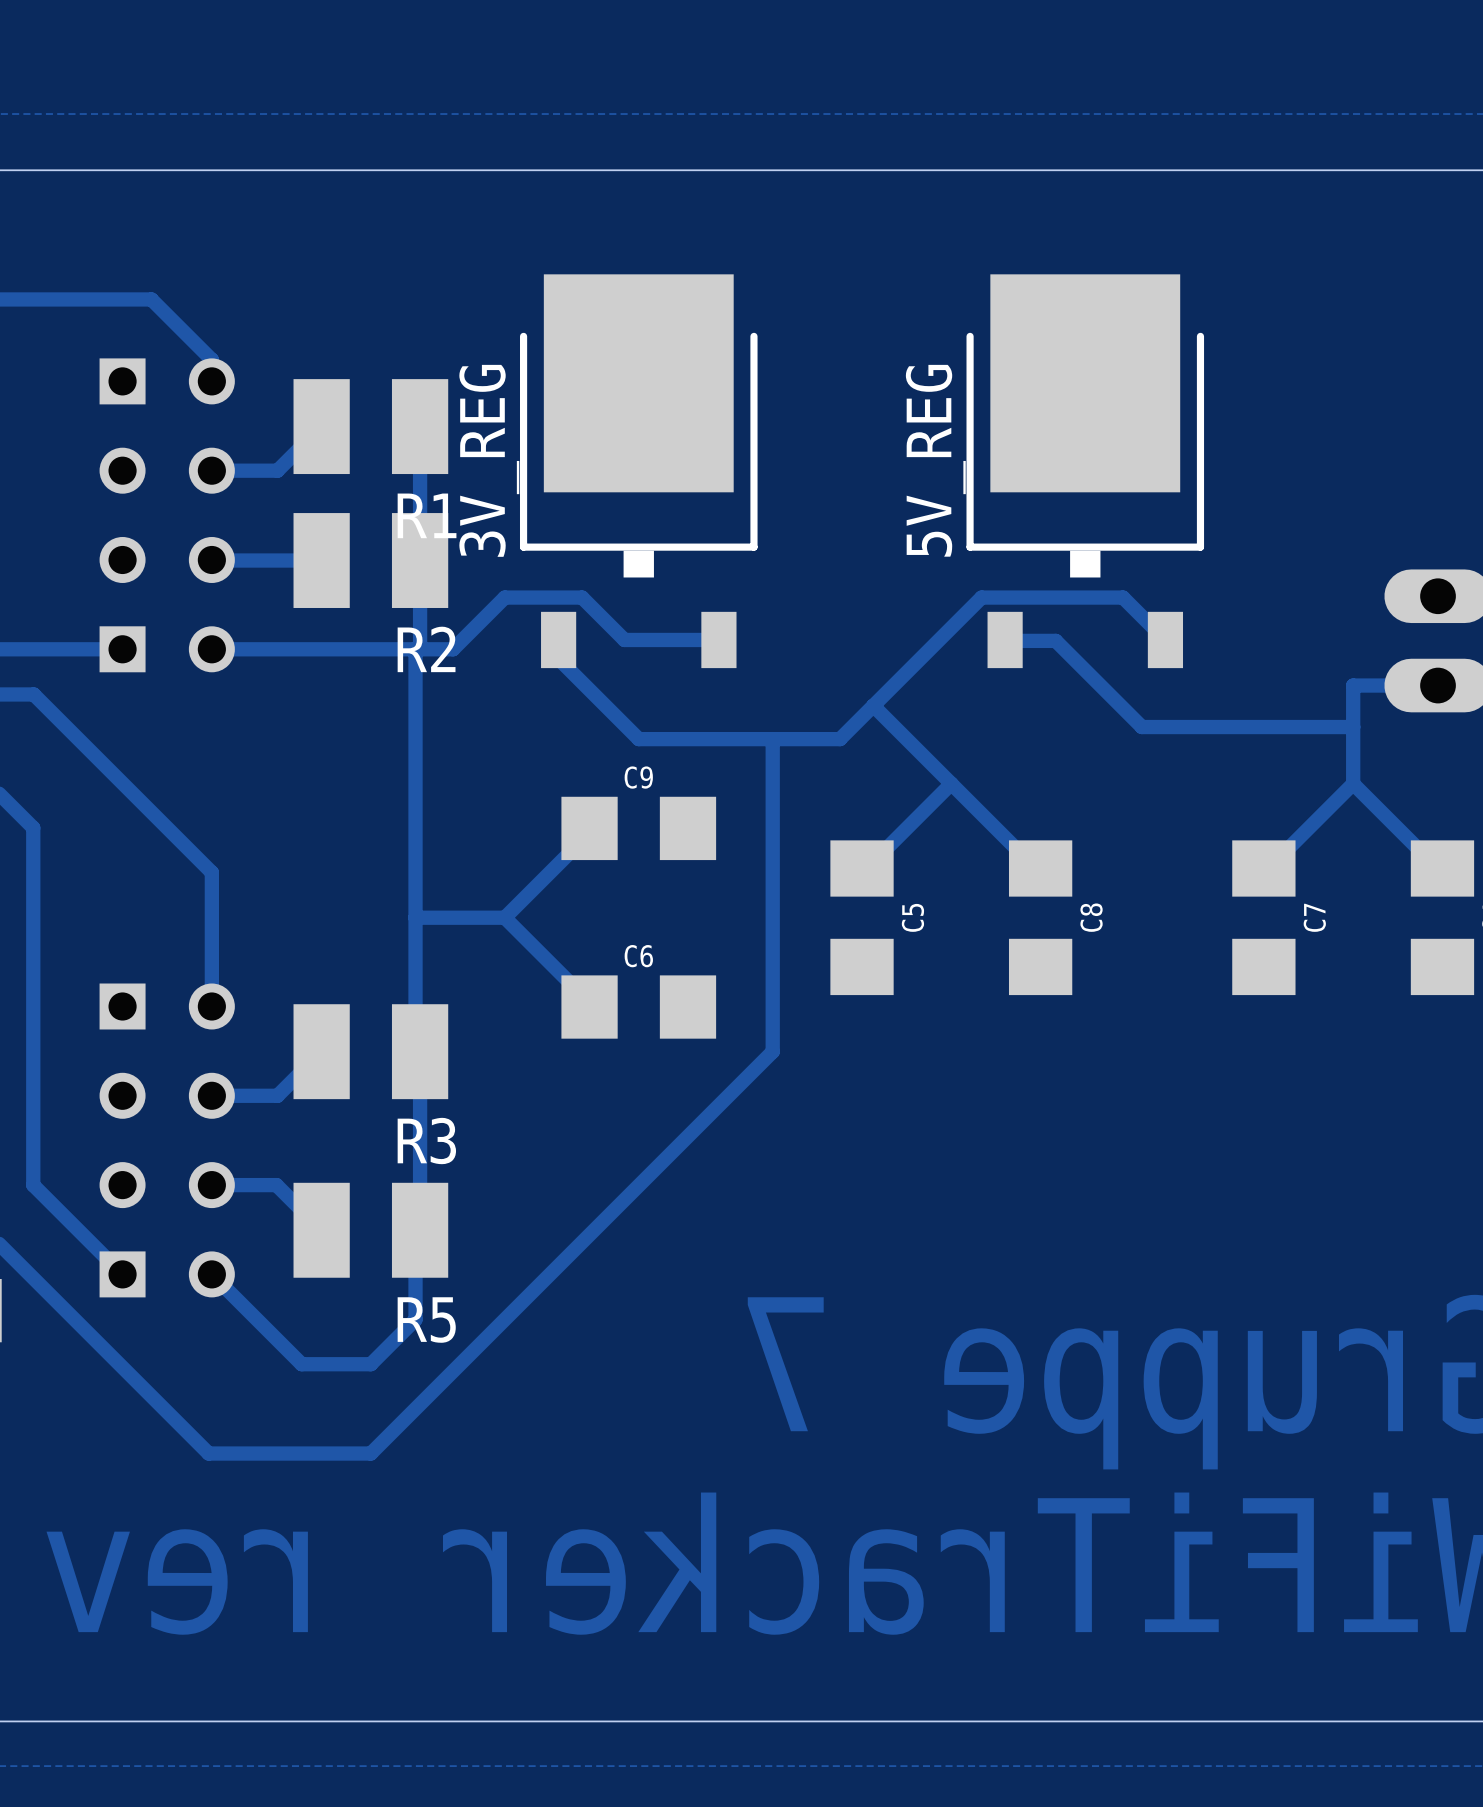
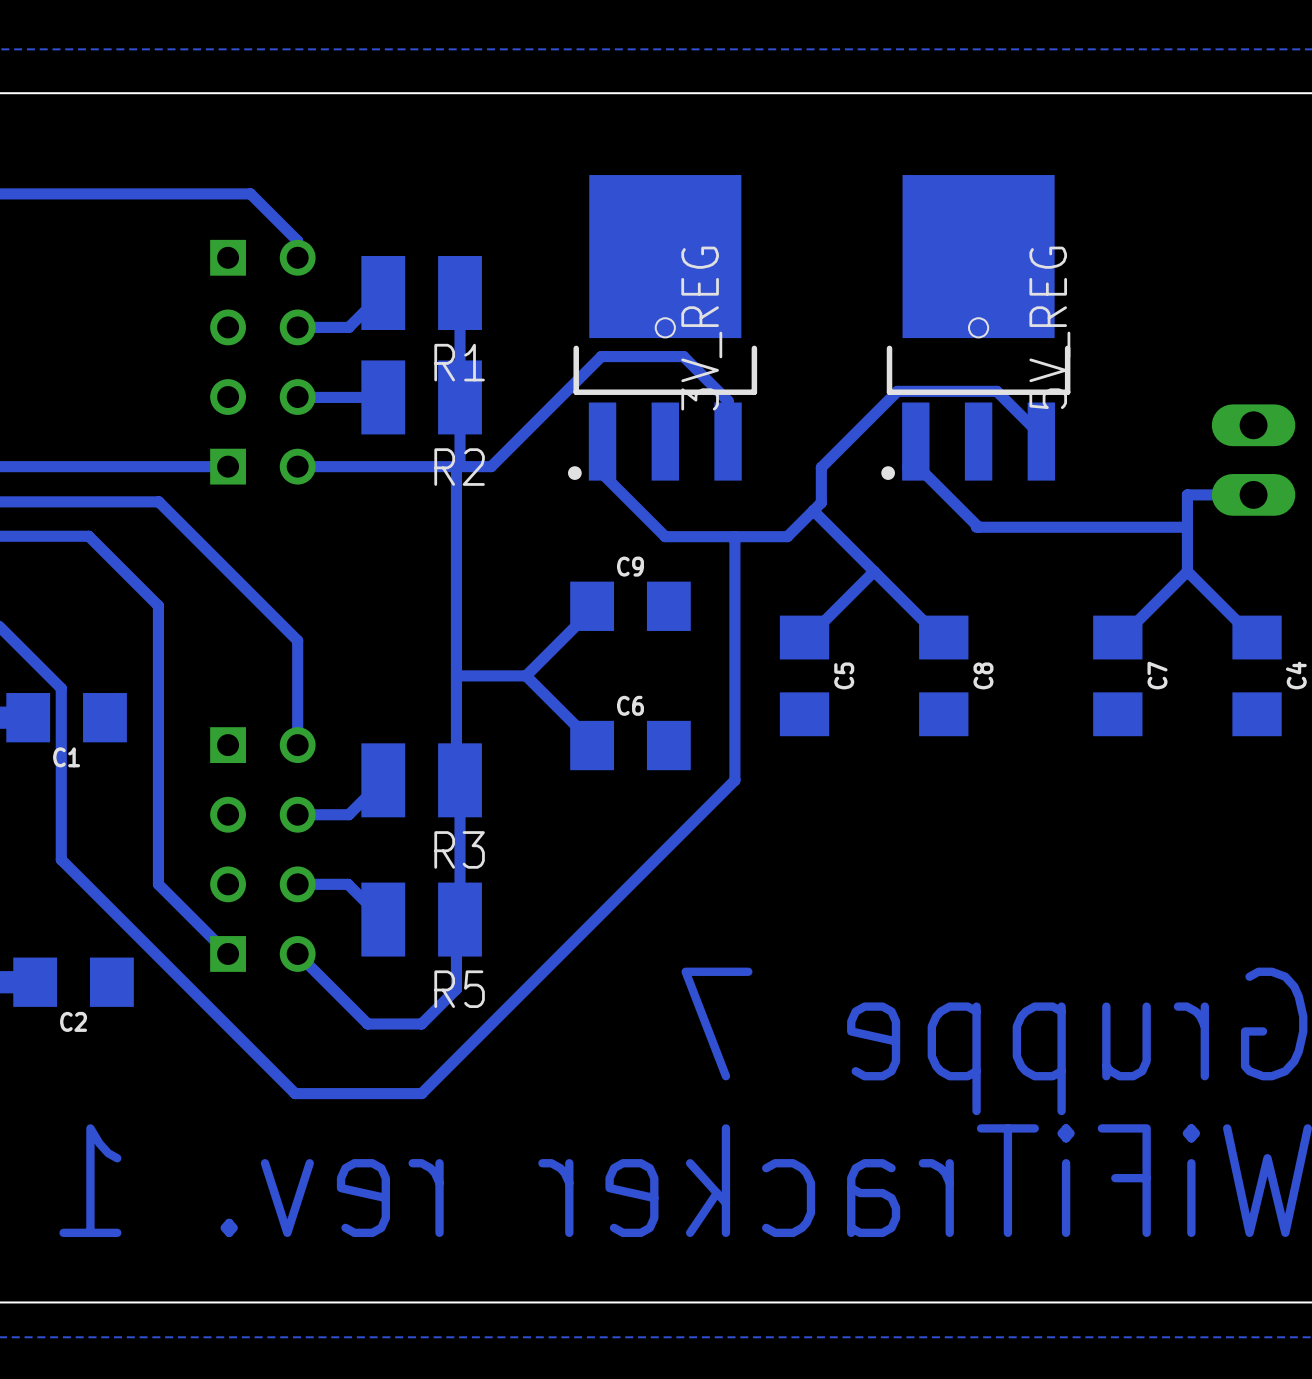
3V_REG footprint: [519, 274, 758, 669] -> [568, 175, 758, 481]
5V_REG footprint: [966, 274, 1205, 669] -> [881, 175, 1071, 481]
3V_REG name position: 3V_REG (489, 460) -> 3V_REG (701, 328)
5V_REG name position: 5V_REG (935, 460) -> 5V_REG (1049, 327)
track: (558, 639) (558, 658) (638, 739) (683, 739) -> (602, 441) (602, 473) (665, 536)
track: (718, 639) (624, 639) (582, 597) (504, 597) (453, 649) -> (728, 441) (728, 401) (683, 356) (601, 356) (491, 466) (485, 466)
track: (1005, 639) (1005, 649) (1014, 640) (1055, 640) (1141, 727) -> (976, 527) (1022, 527)
track: (1165, 639) (1123, 597) (981, 597) (883, 695) -> (1041, 441) (1041, 435) (996, 391) (897, 391) (821, 467) (821, 502)
track: none -> (908, 467) (918, 467) (978, 527)

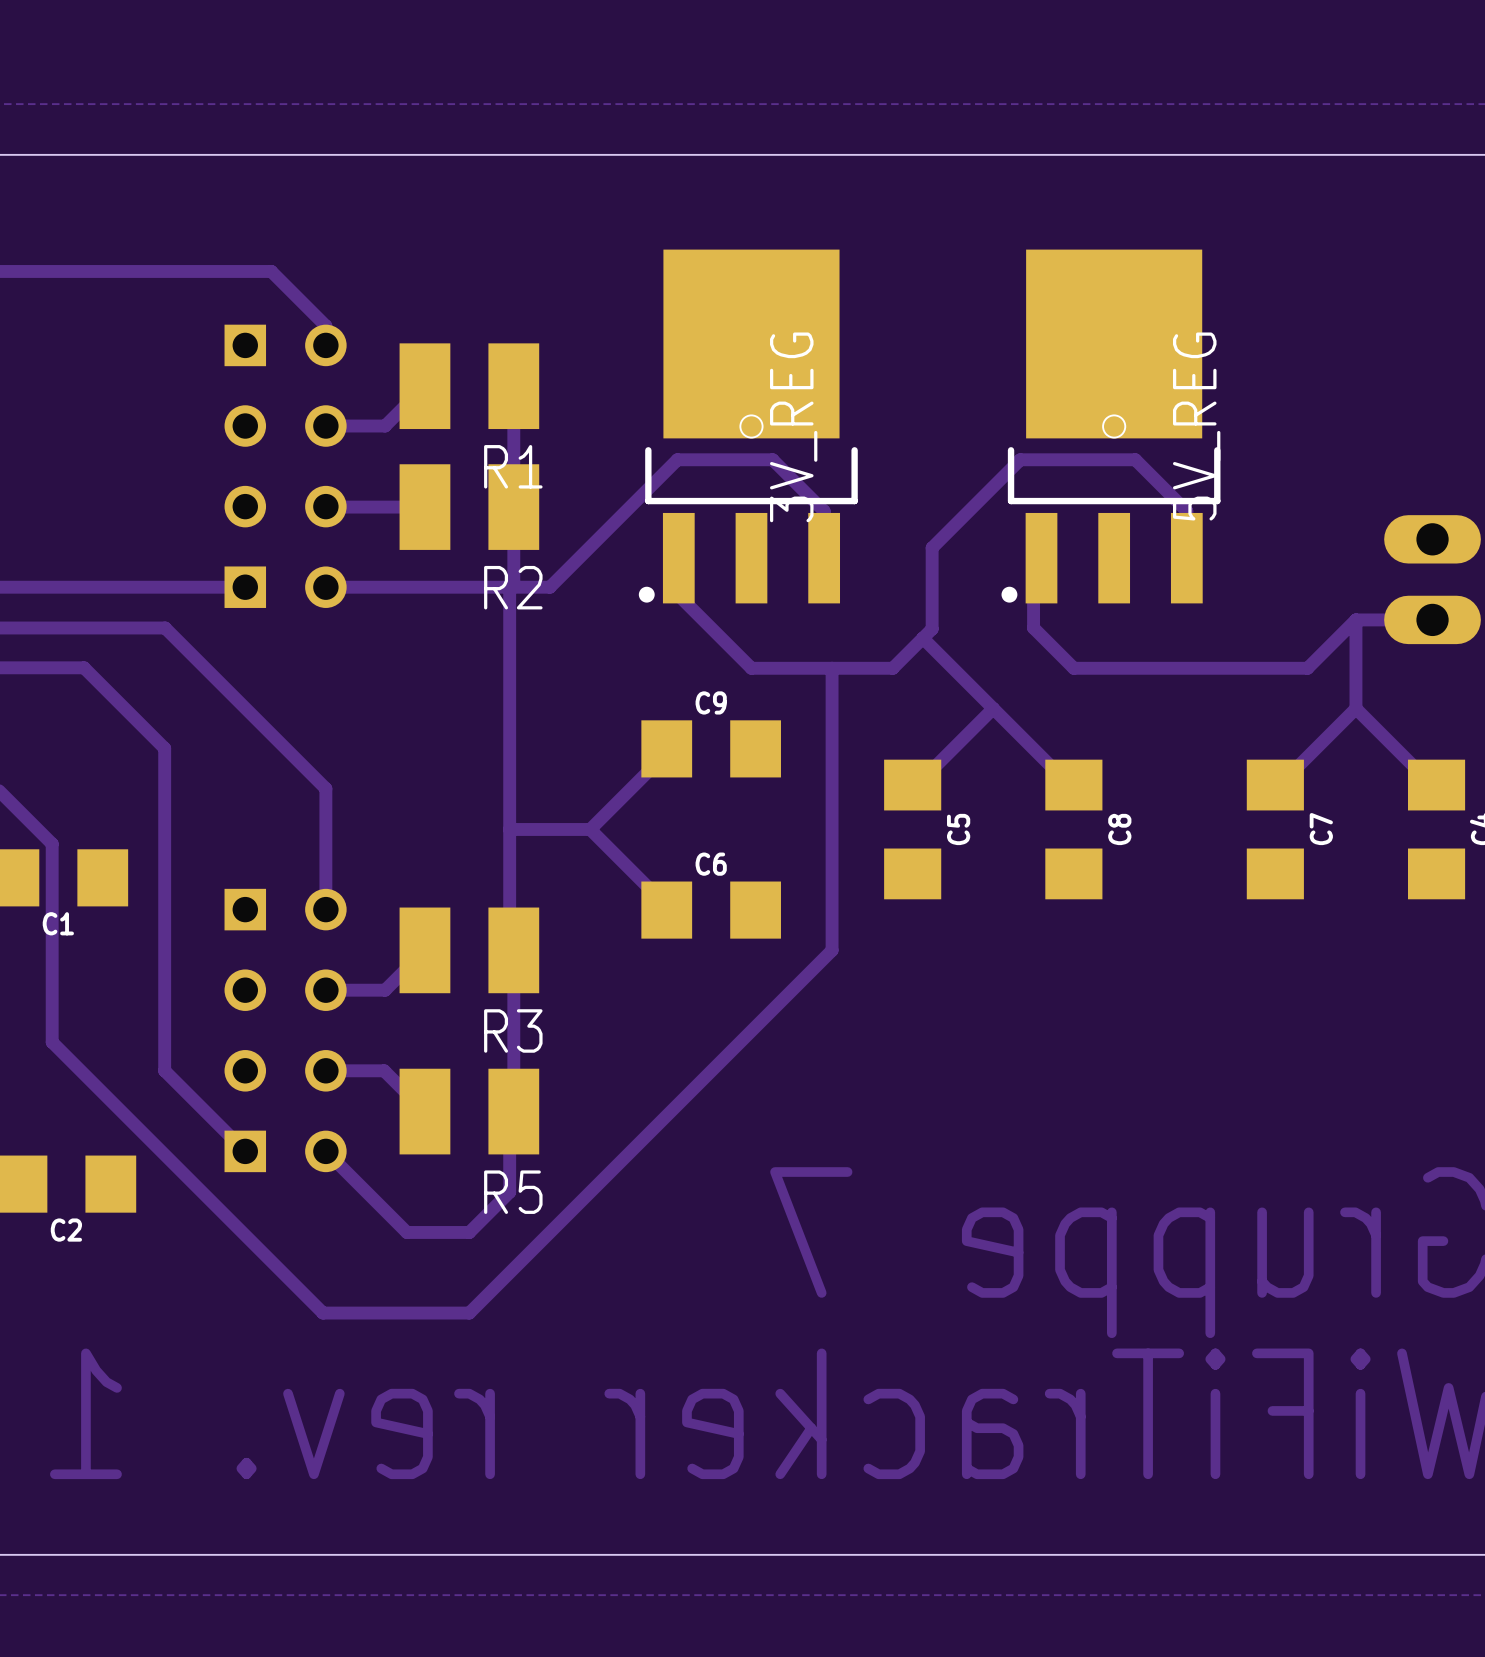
track: (1041, 435) (996, 391) (897, 391) (821, 467) -> (1186, 551) (1186, 511) (1135, 459) (1020, 459) (932, 547) (932, 588)
track: none -> (1041, 558) (1033, 566) (1033, 627) (1073, 668) (1307, 668) (1355, 619)
track: (908, 467) (918, 467) (978, 527) -> none
track: (1187, 527) (976, 527) -> none

